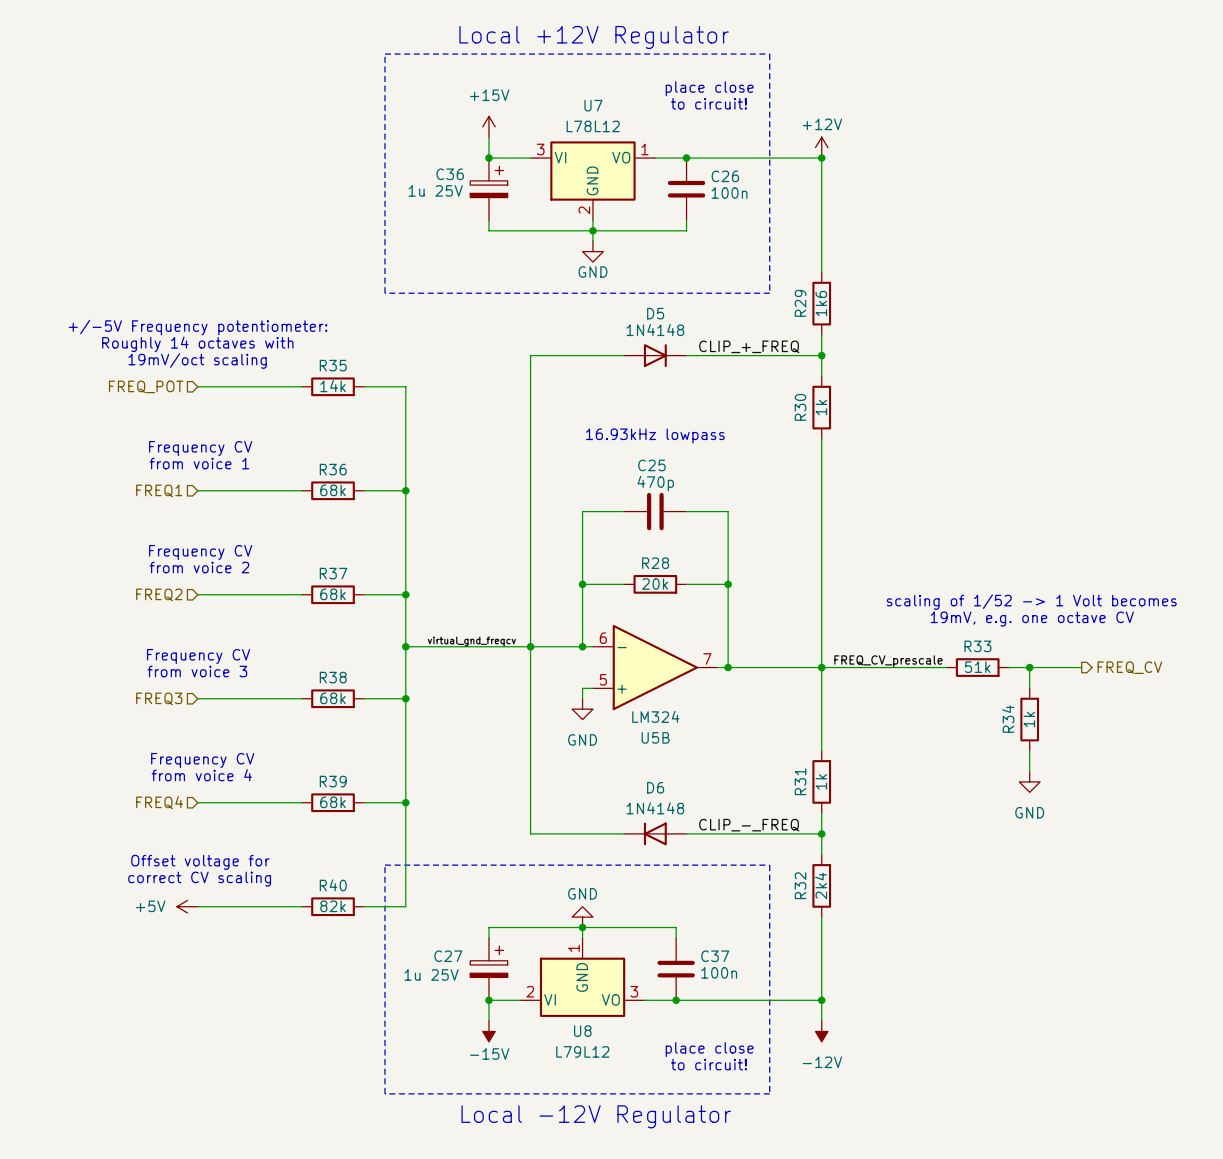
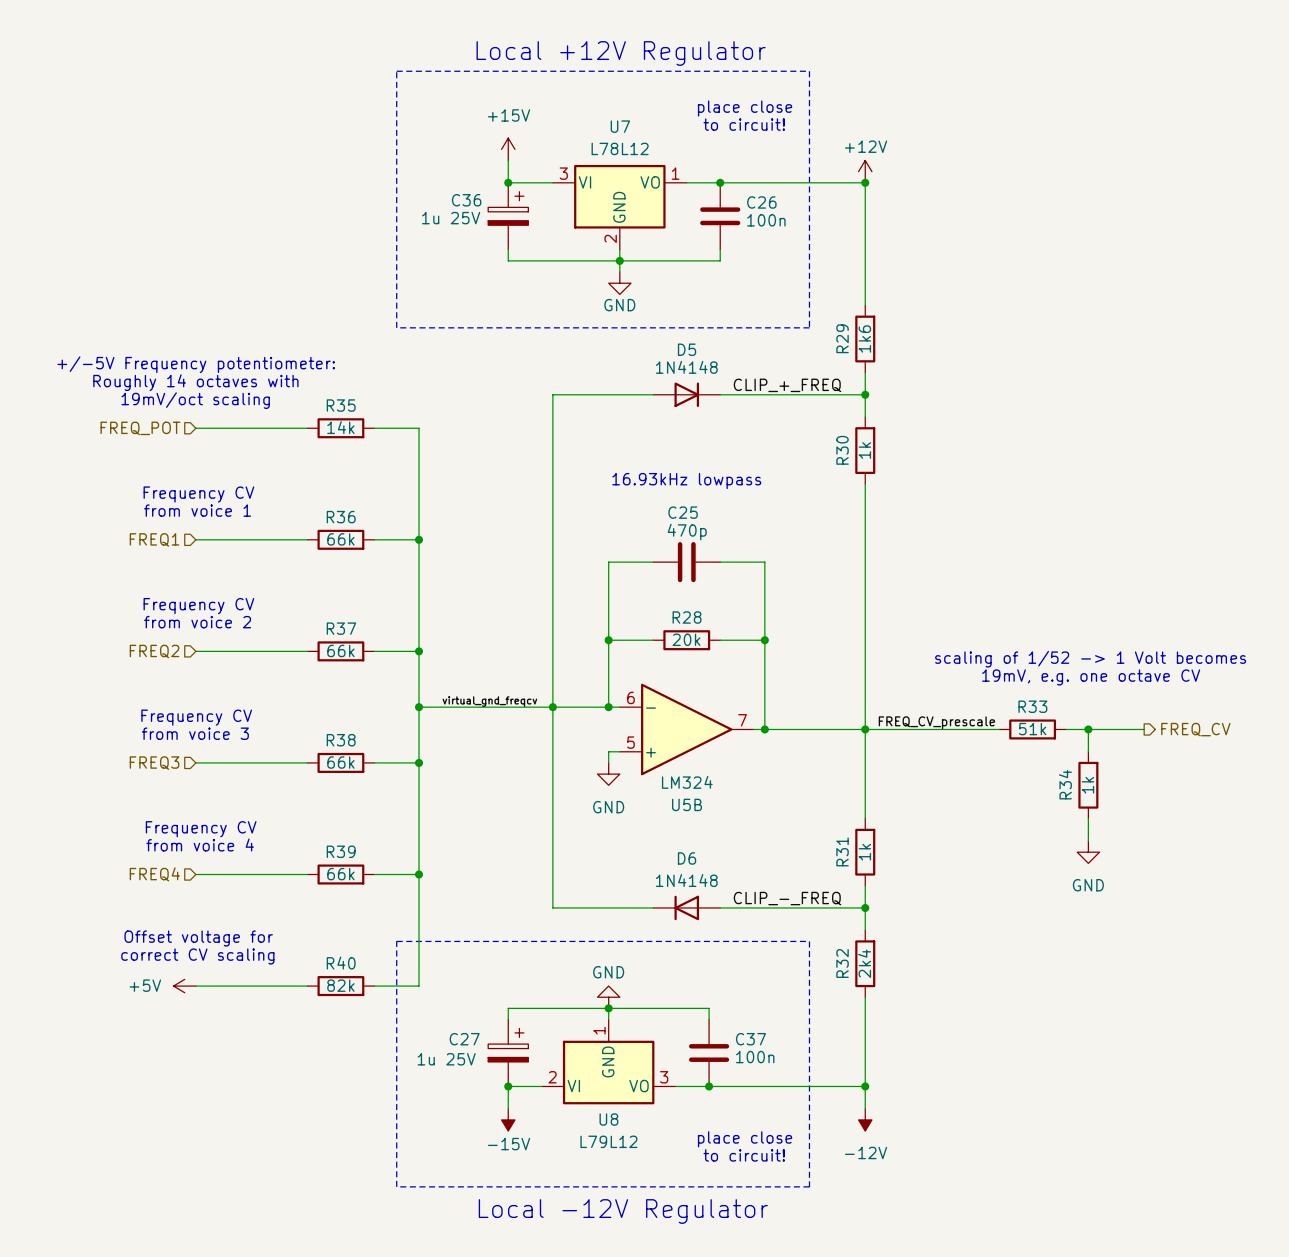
R36 value: 68k (333, 490) -> 66k (340, 539)
R37 value: 68k (333, 594) -> 66k (340, 650)
R38 value: 68k (333, 698) -> 66k (340, 762)
R39 value: 68k (333, 802) -> 66k (340, 874)

